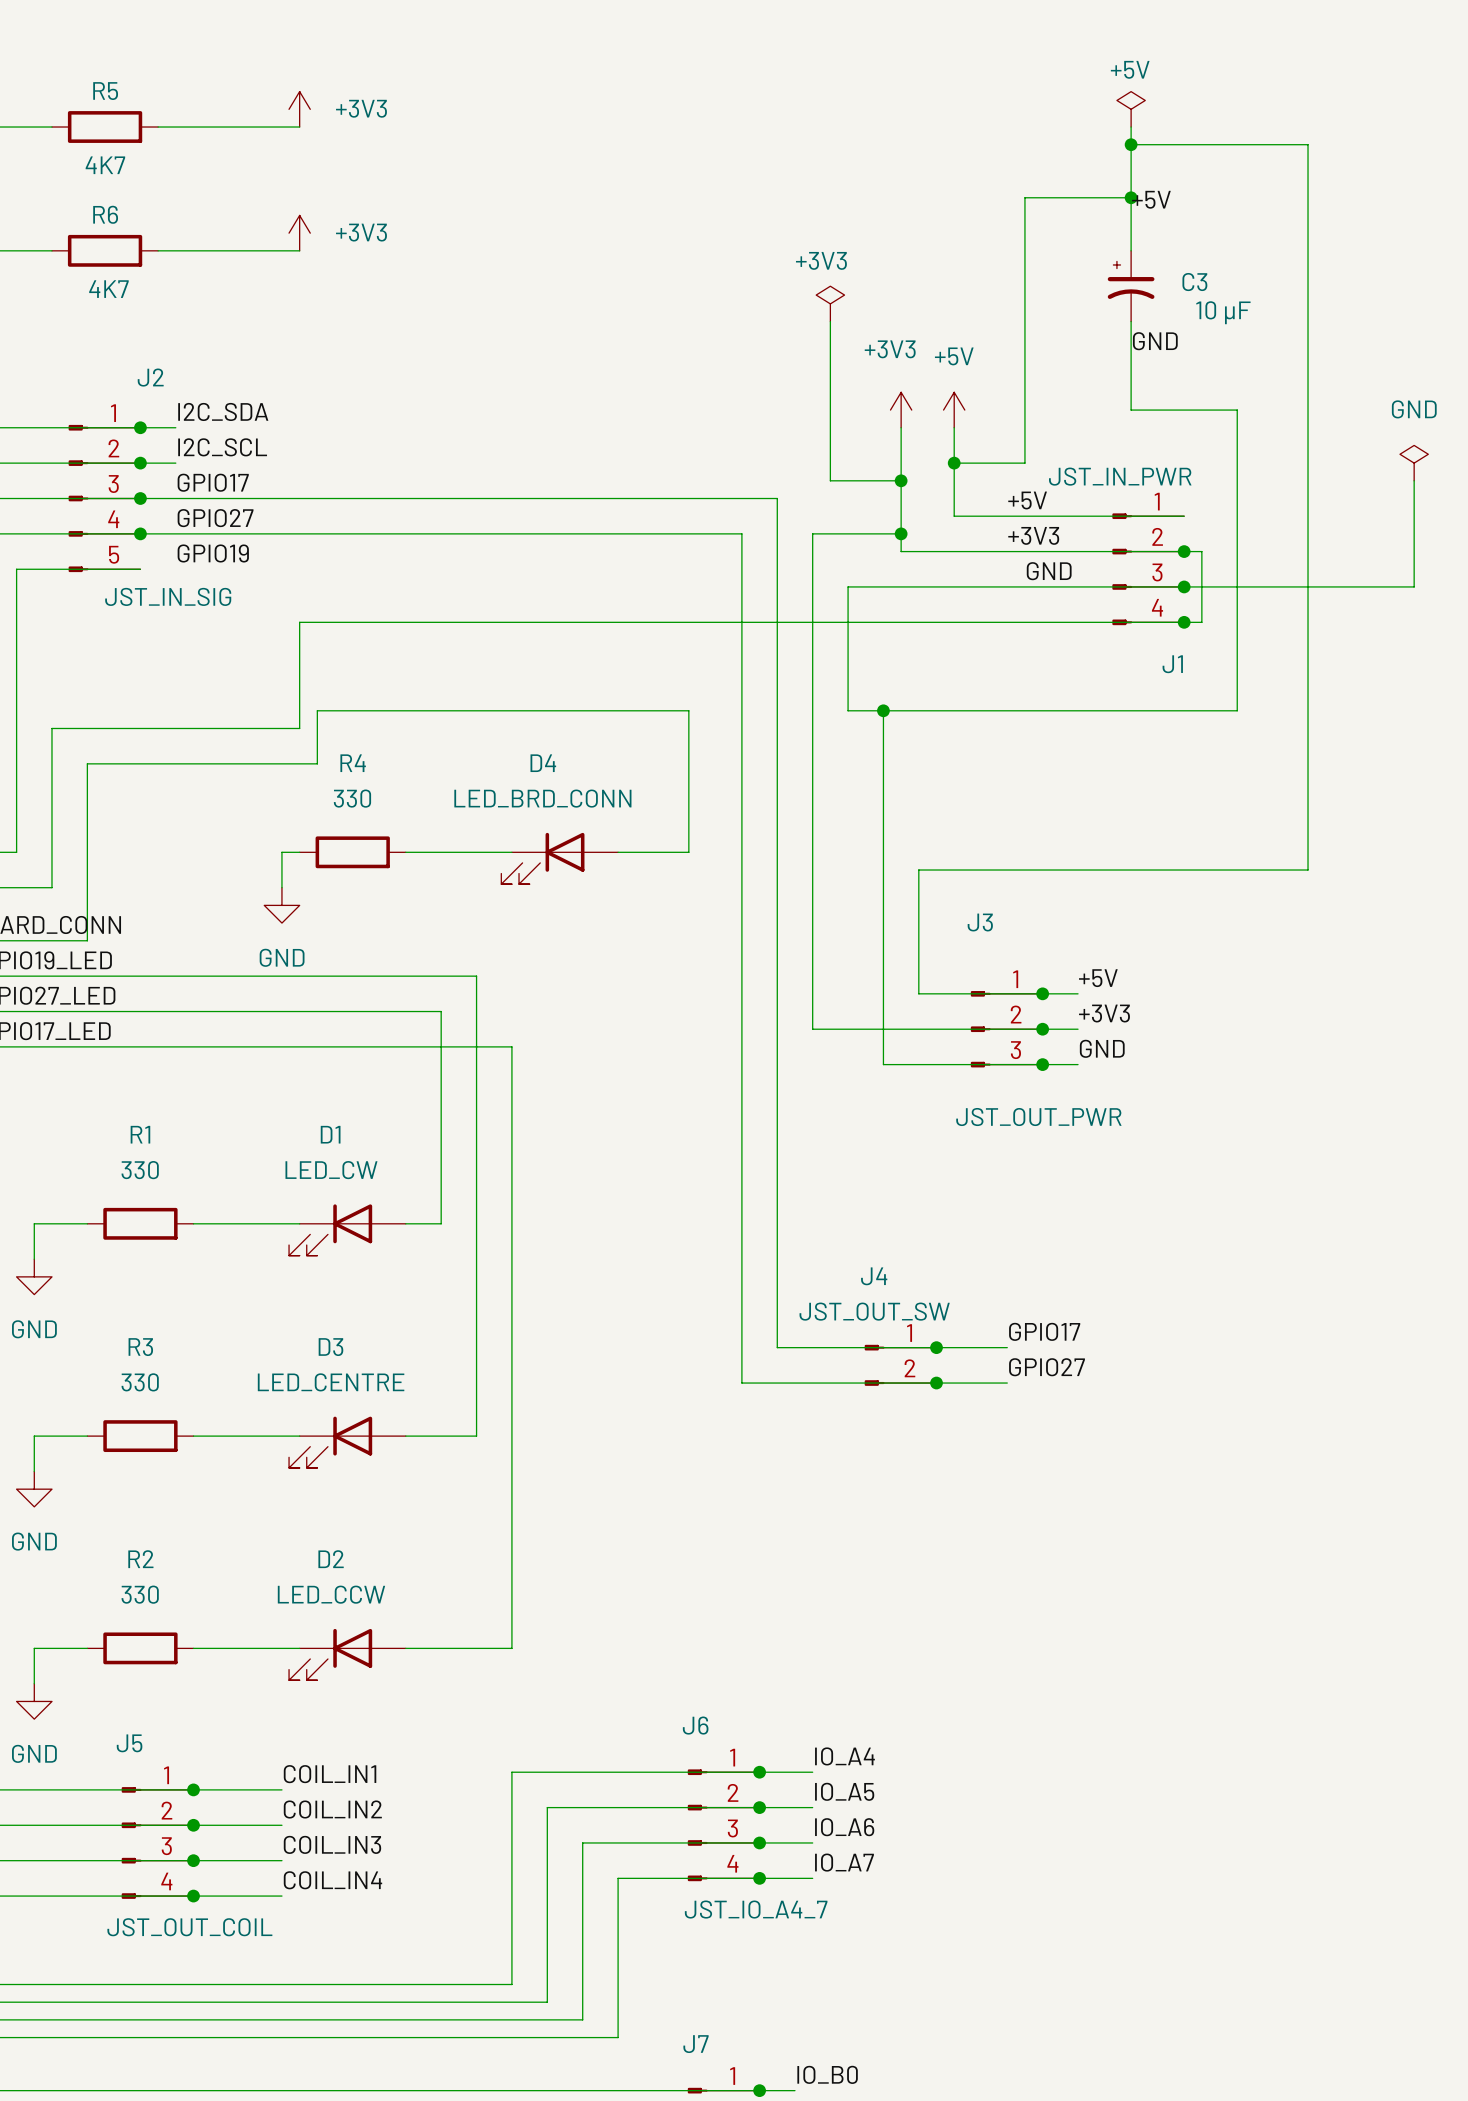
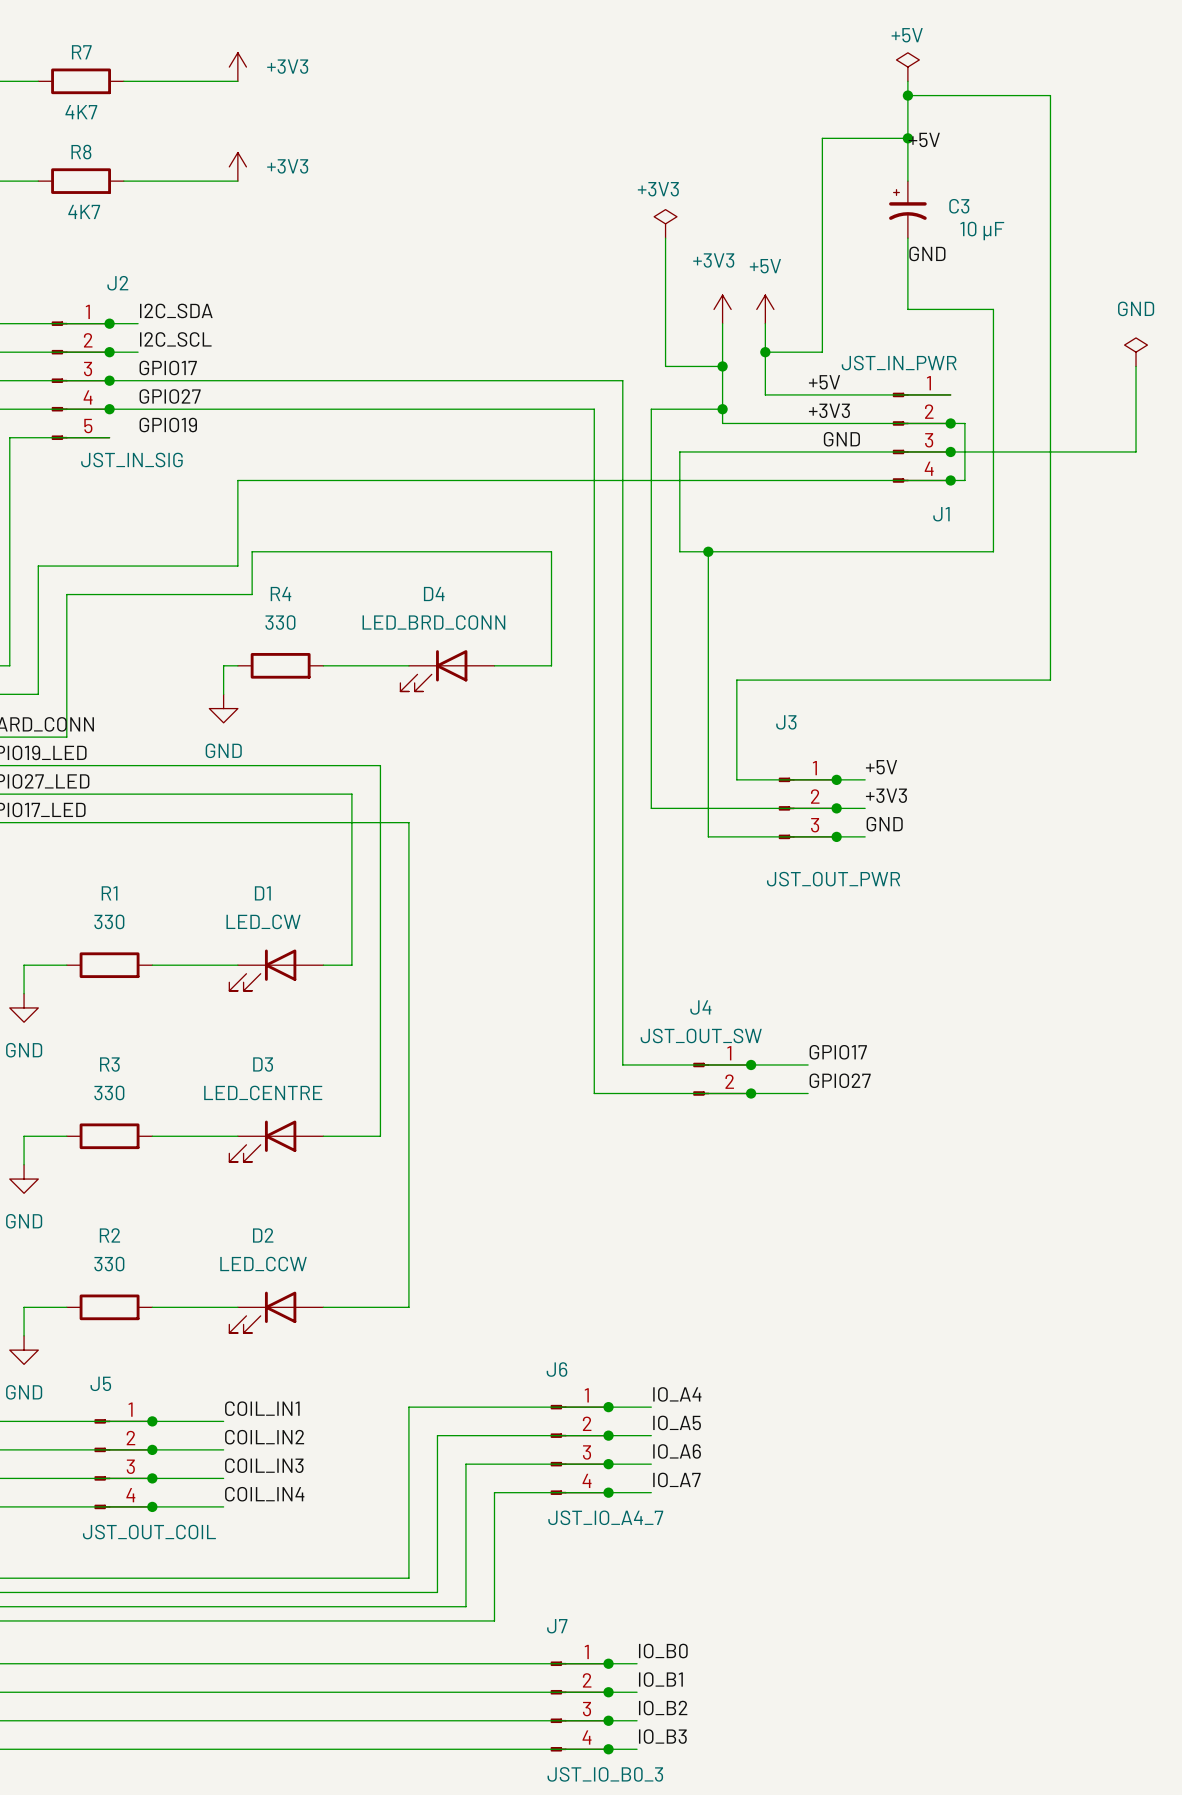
R5 name: R5 (105, 91) -> R7 (81, 52)
R6 name: R6 (105, 214) -> R8 (81, 152)

